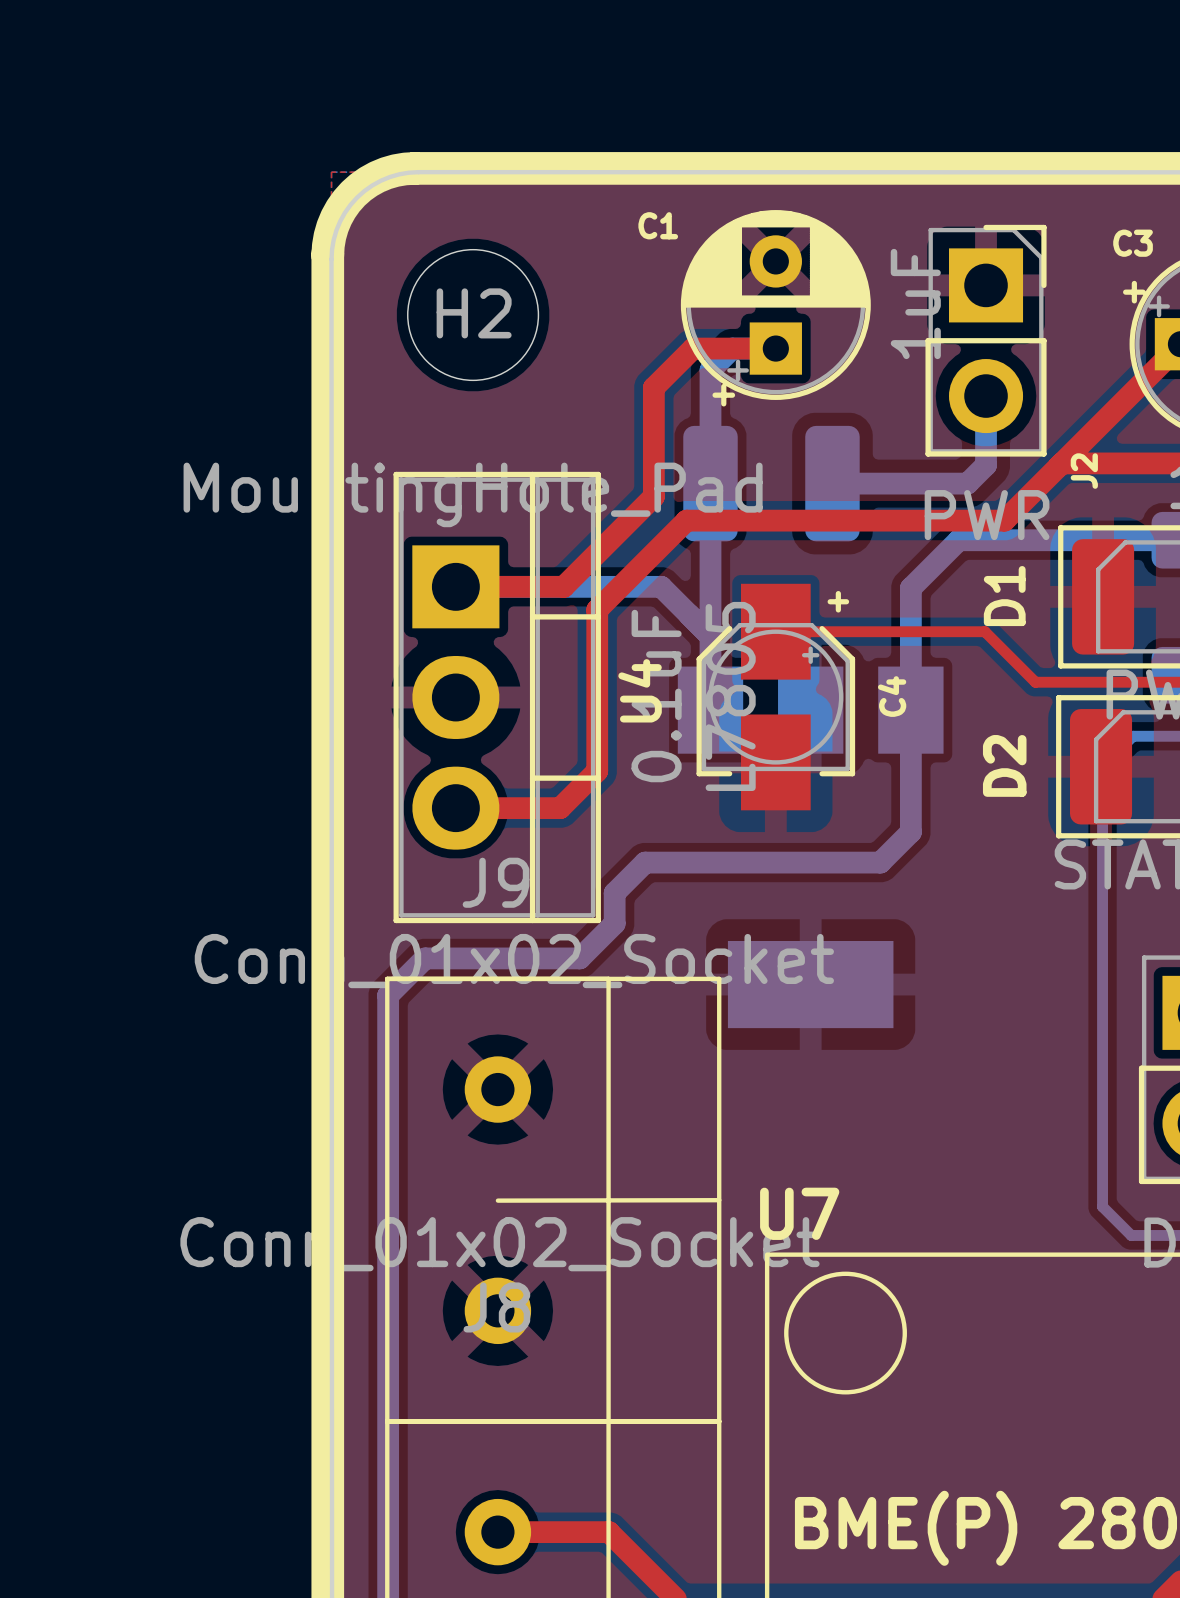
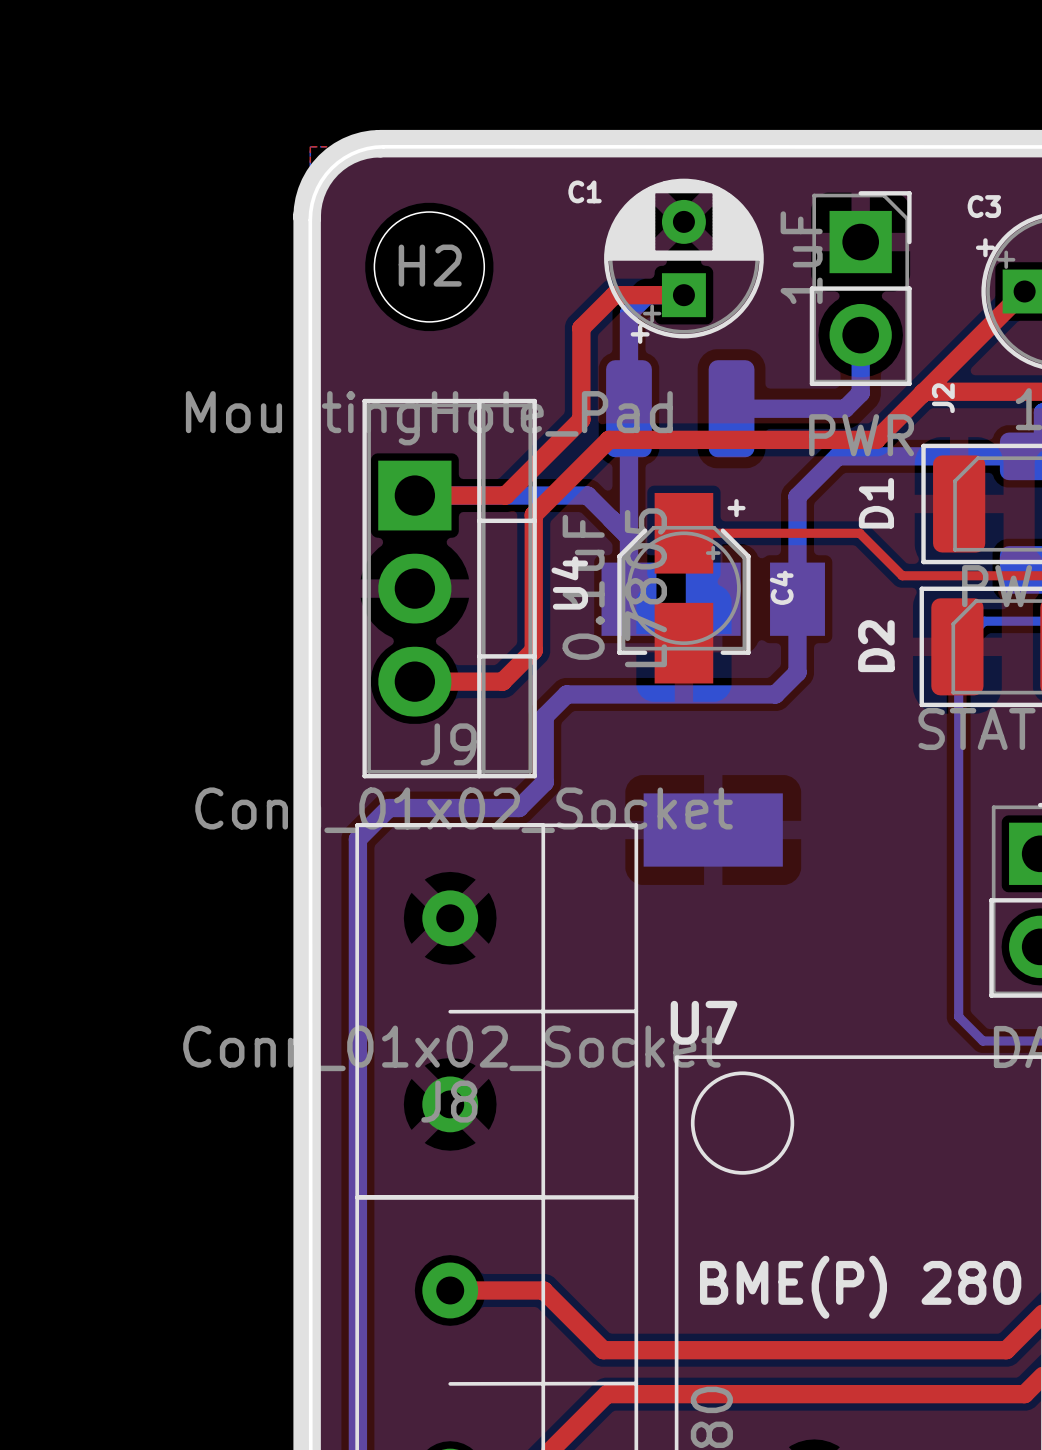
bottom track: (910, 797) (910, 832) (880, 862) (645, 862) (614, 893) (614, 923) (610, 927) -> (797, 672) (775, 694) (566, 694) (544, 716) (544, 782)

